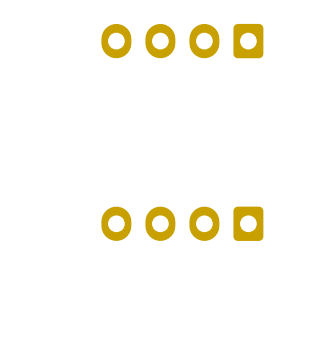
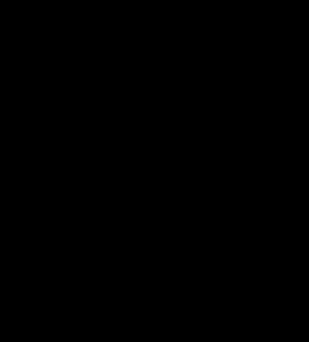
part: (182, 41) -> none
part: (182, 223) -> none

